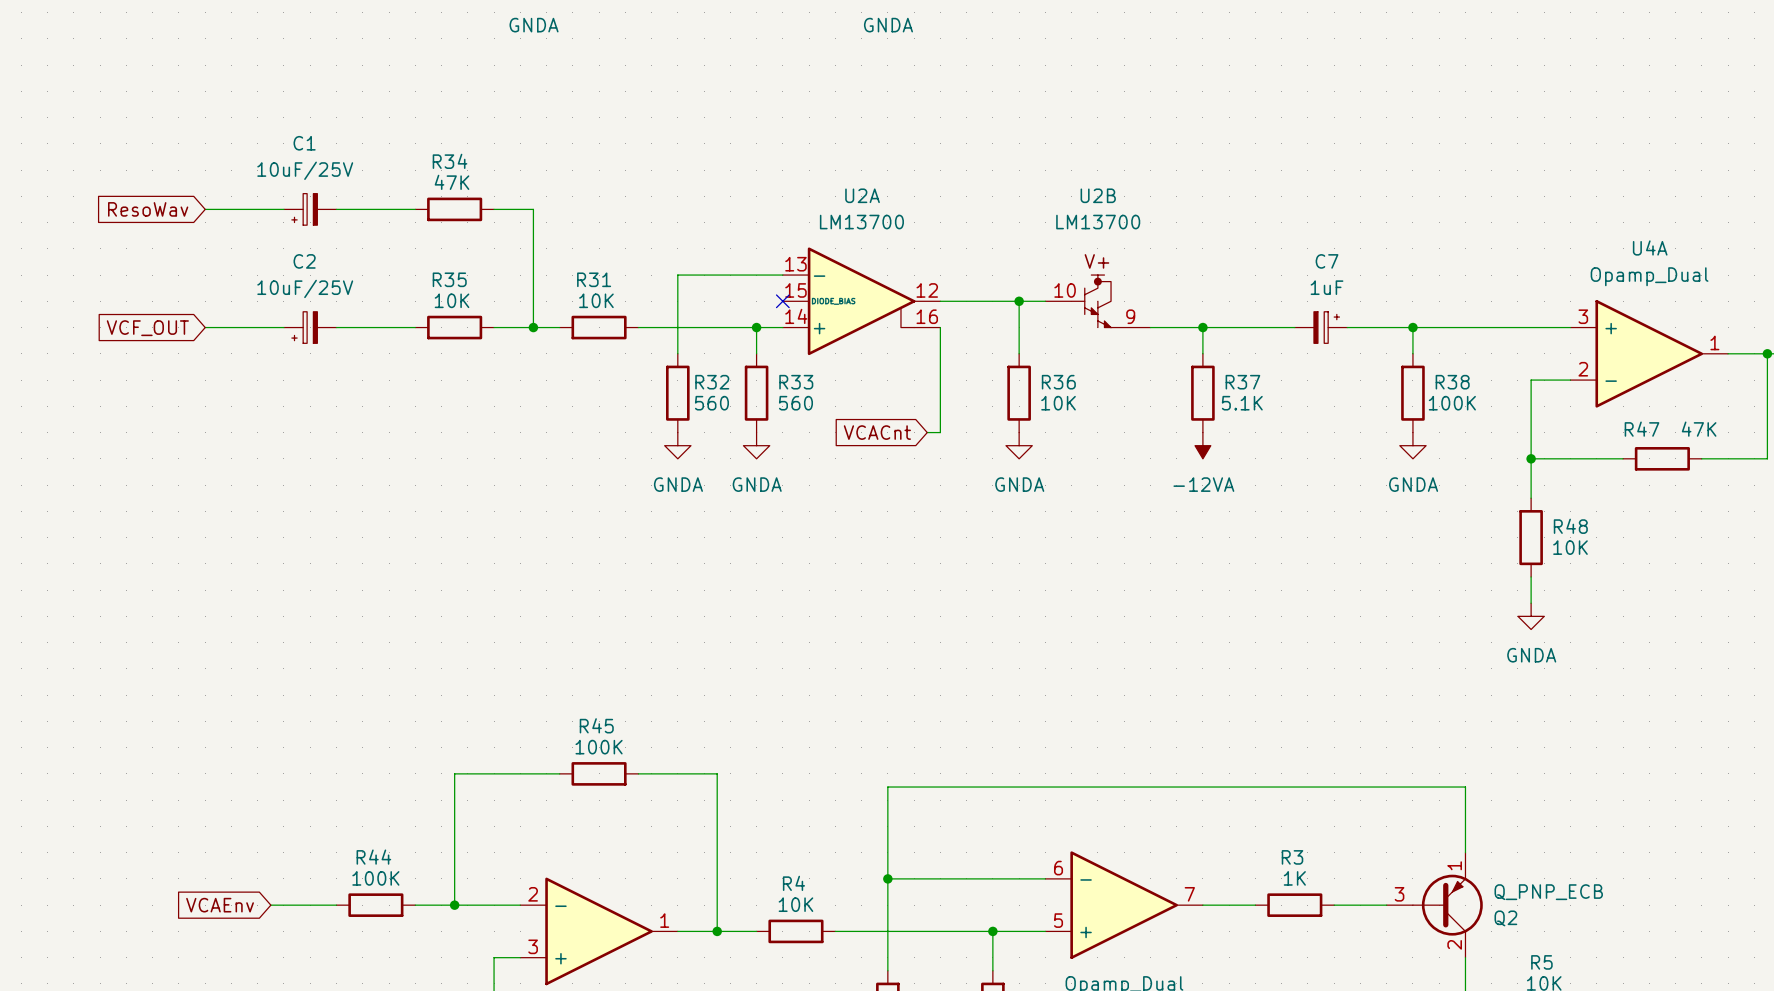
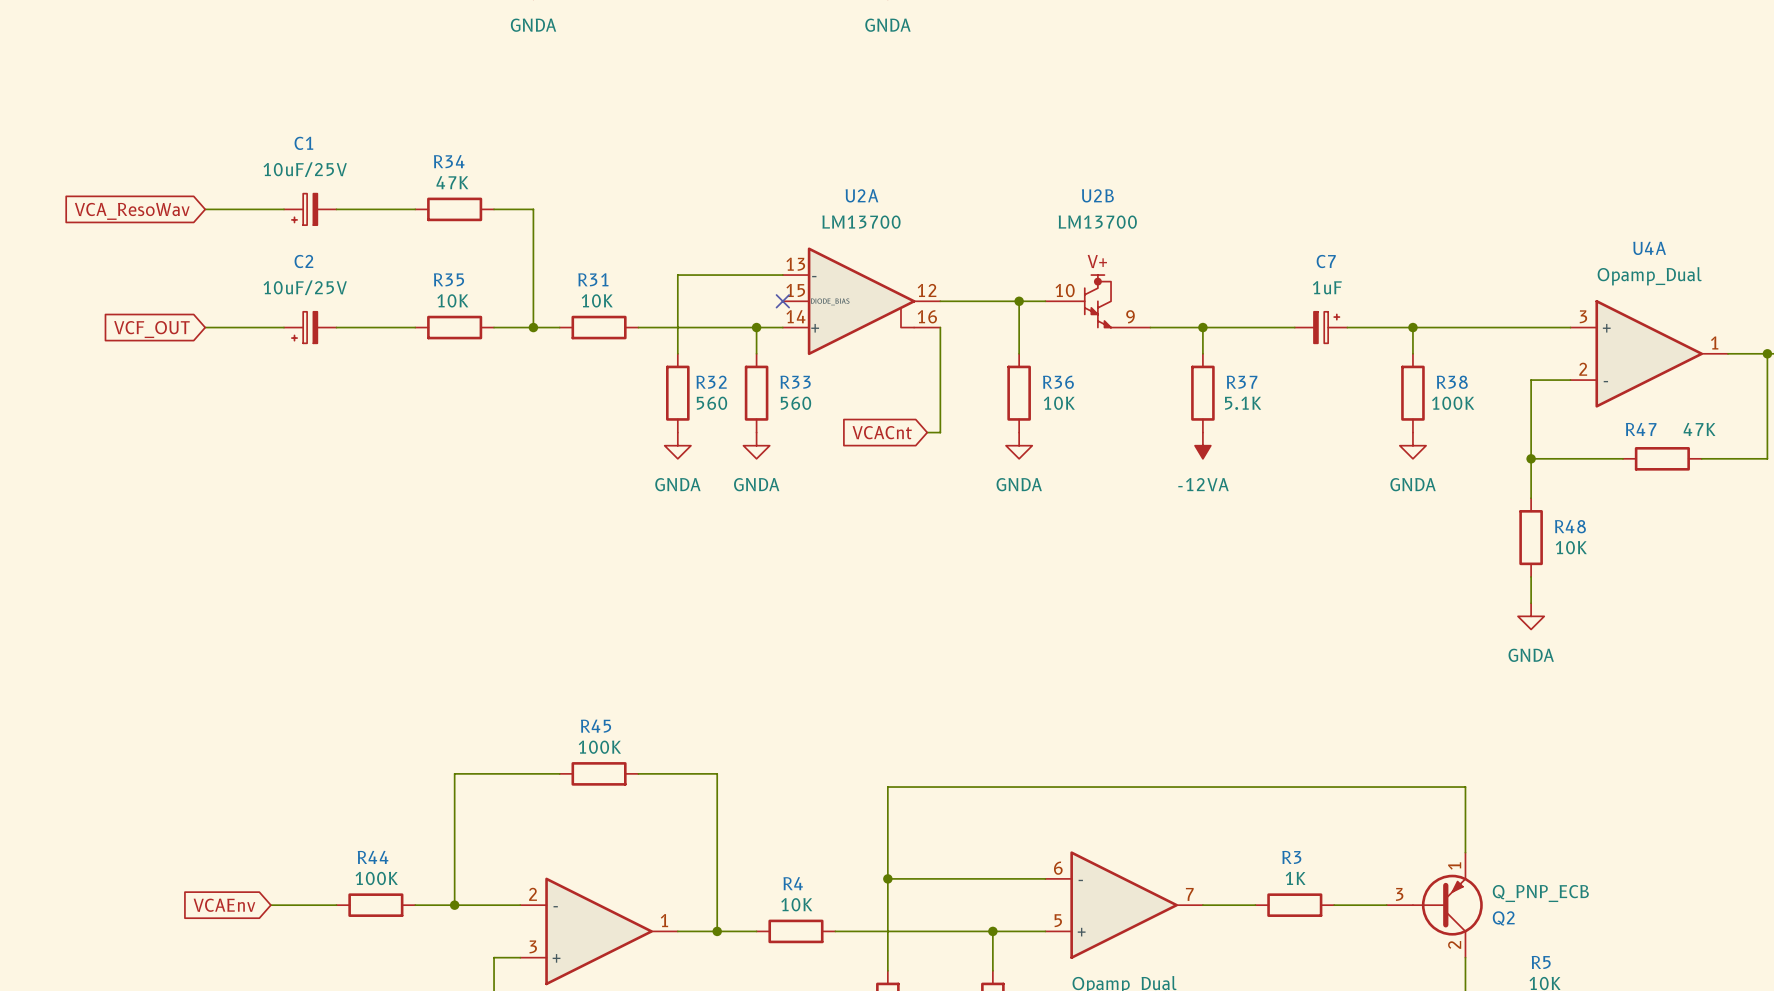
global label: ResoWav (148, 209) -> VCA_ResoWav (132, 211)

